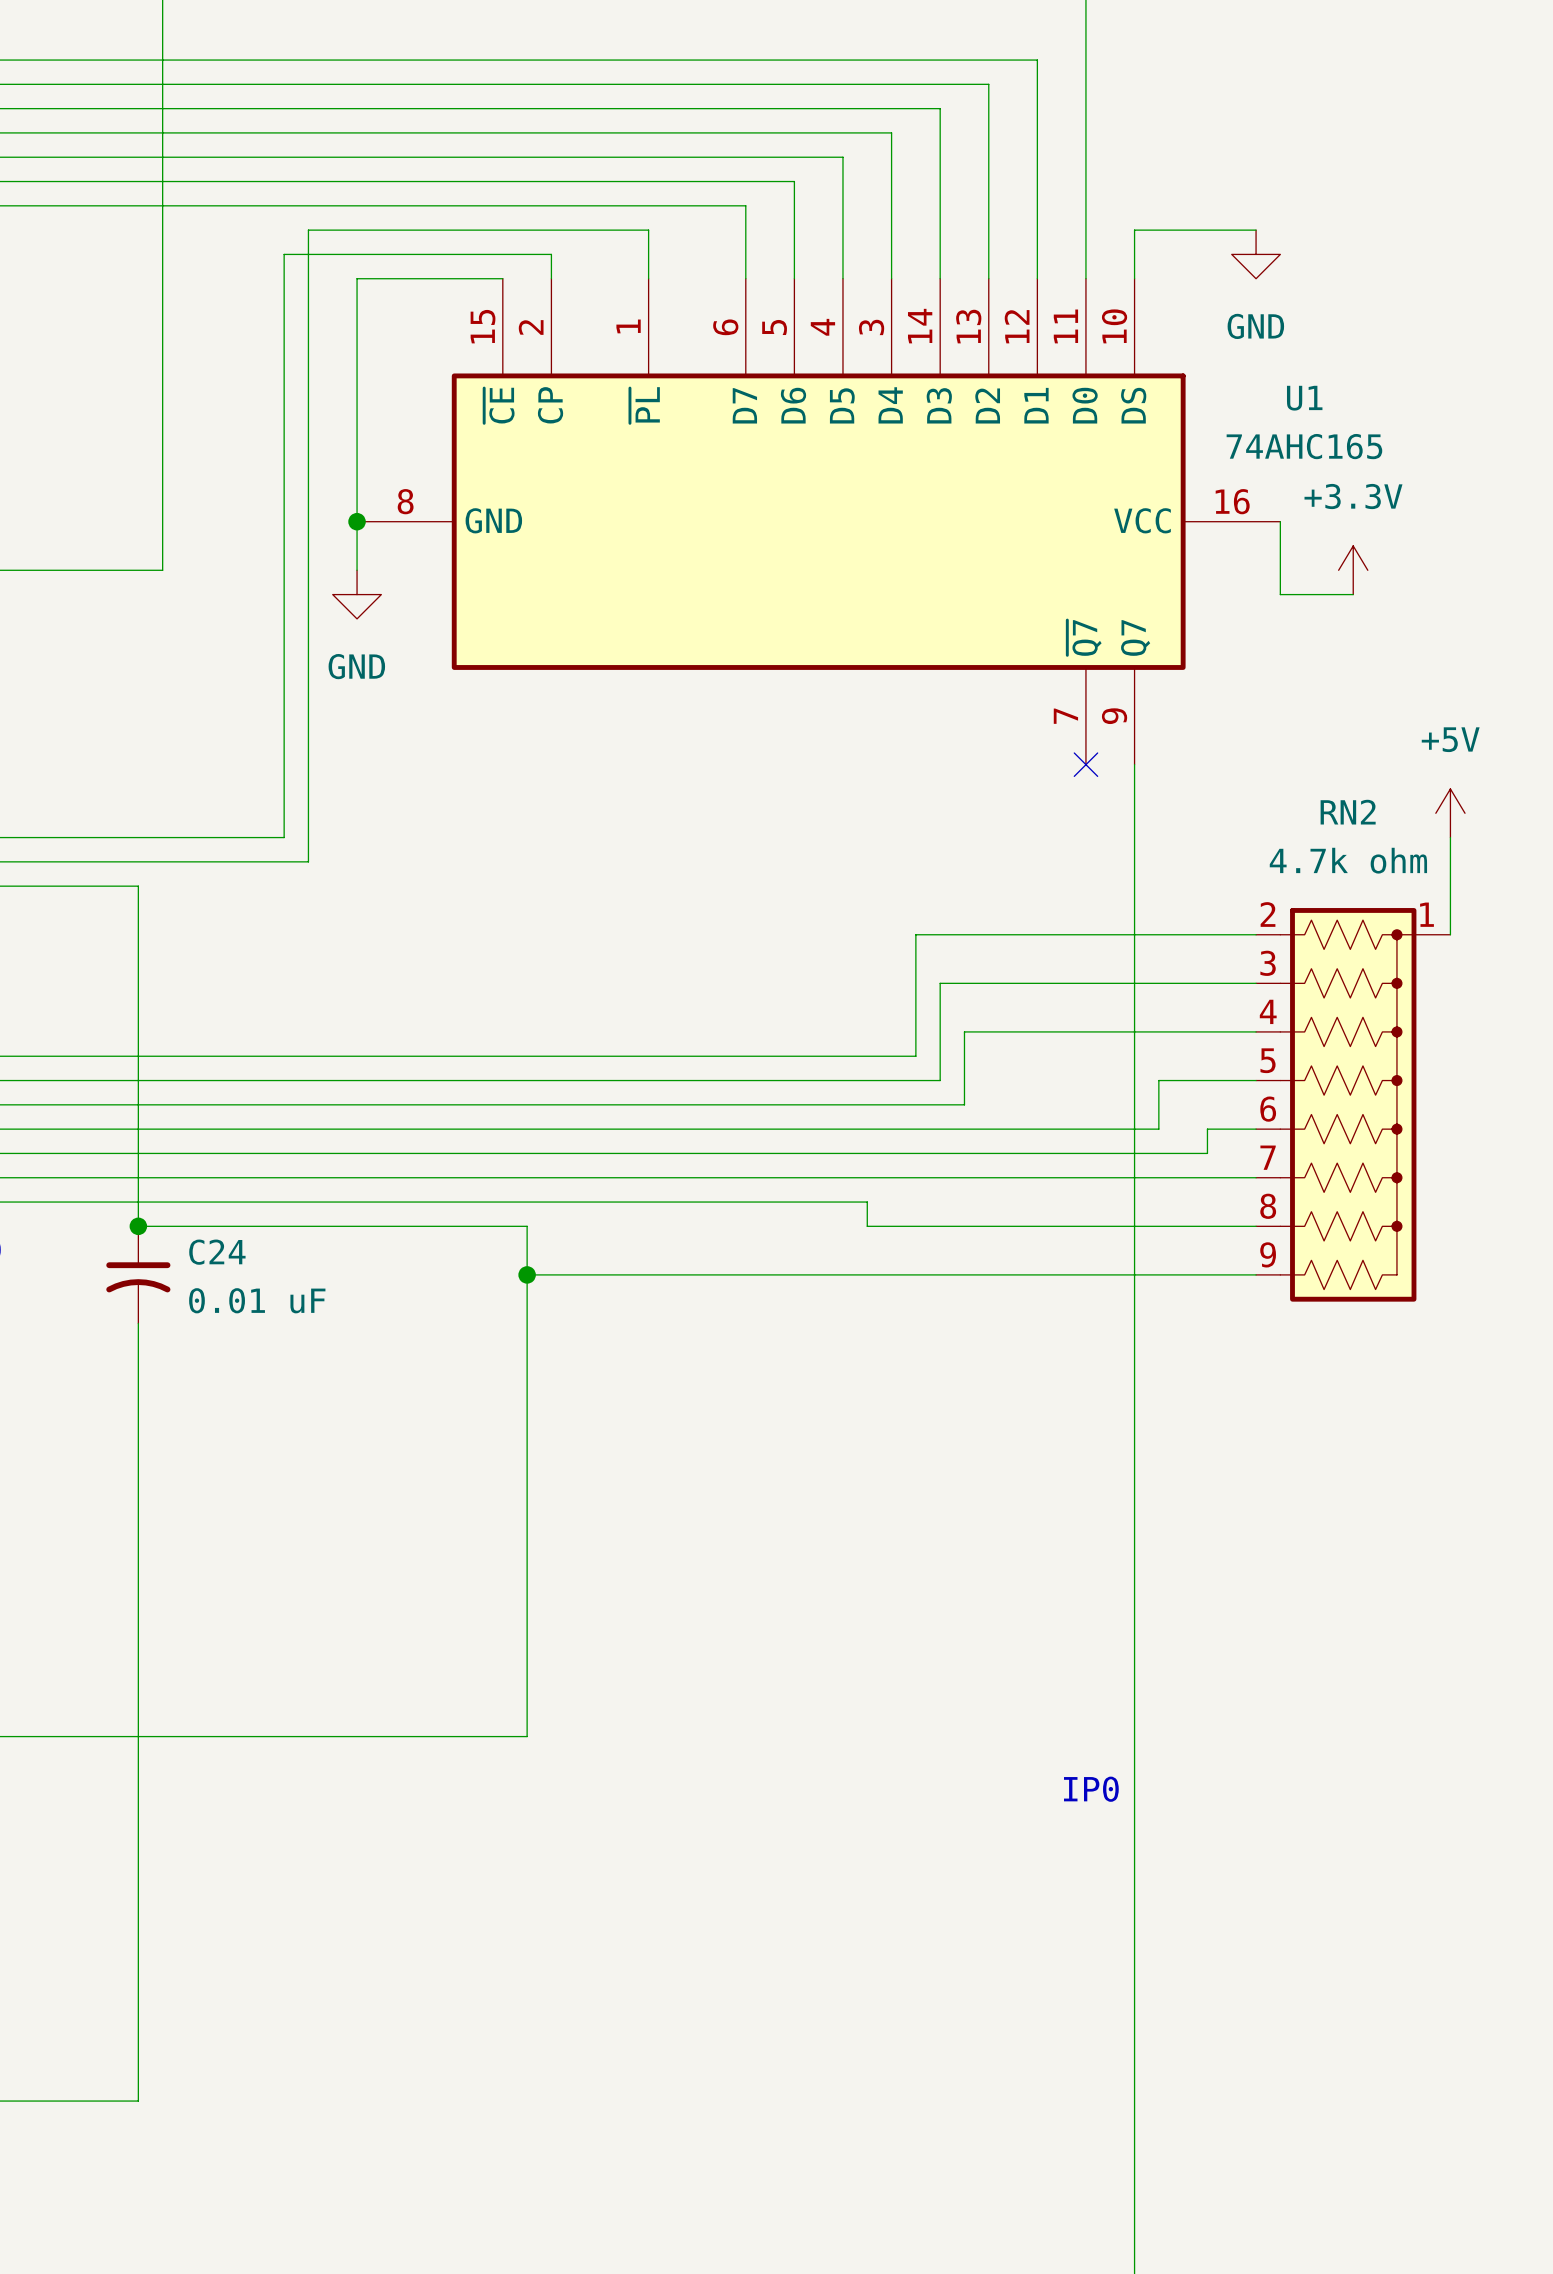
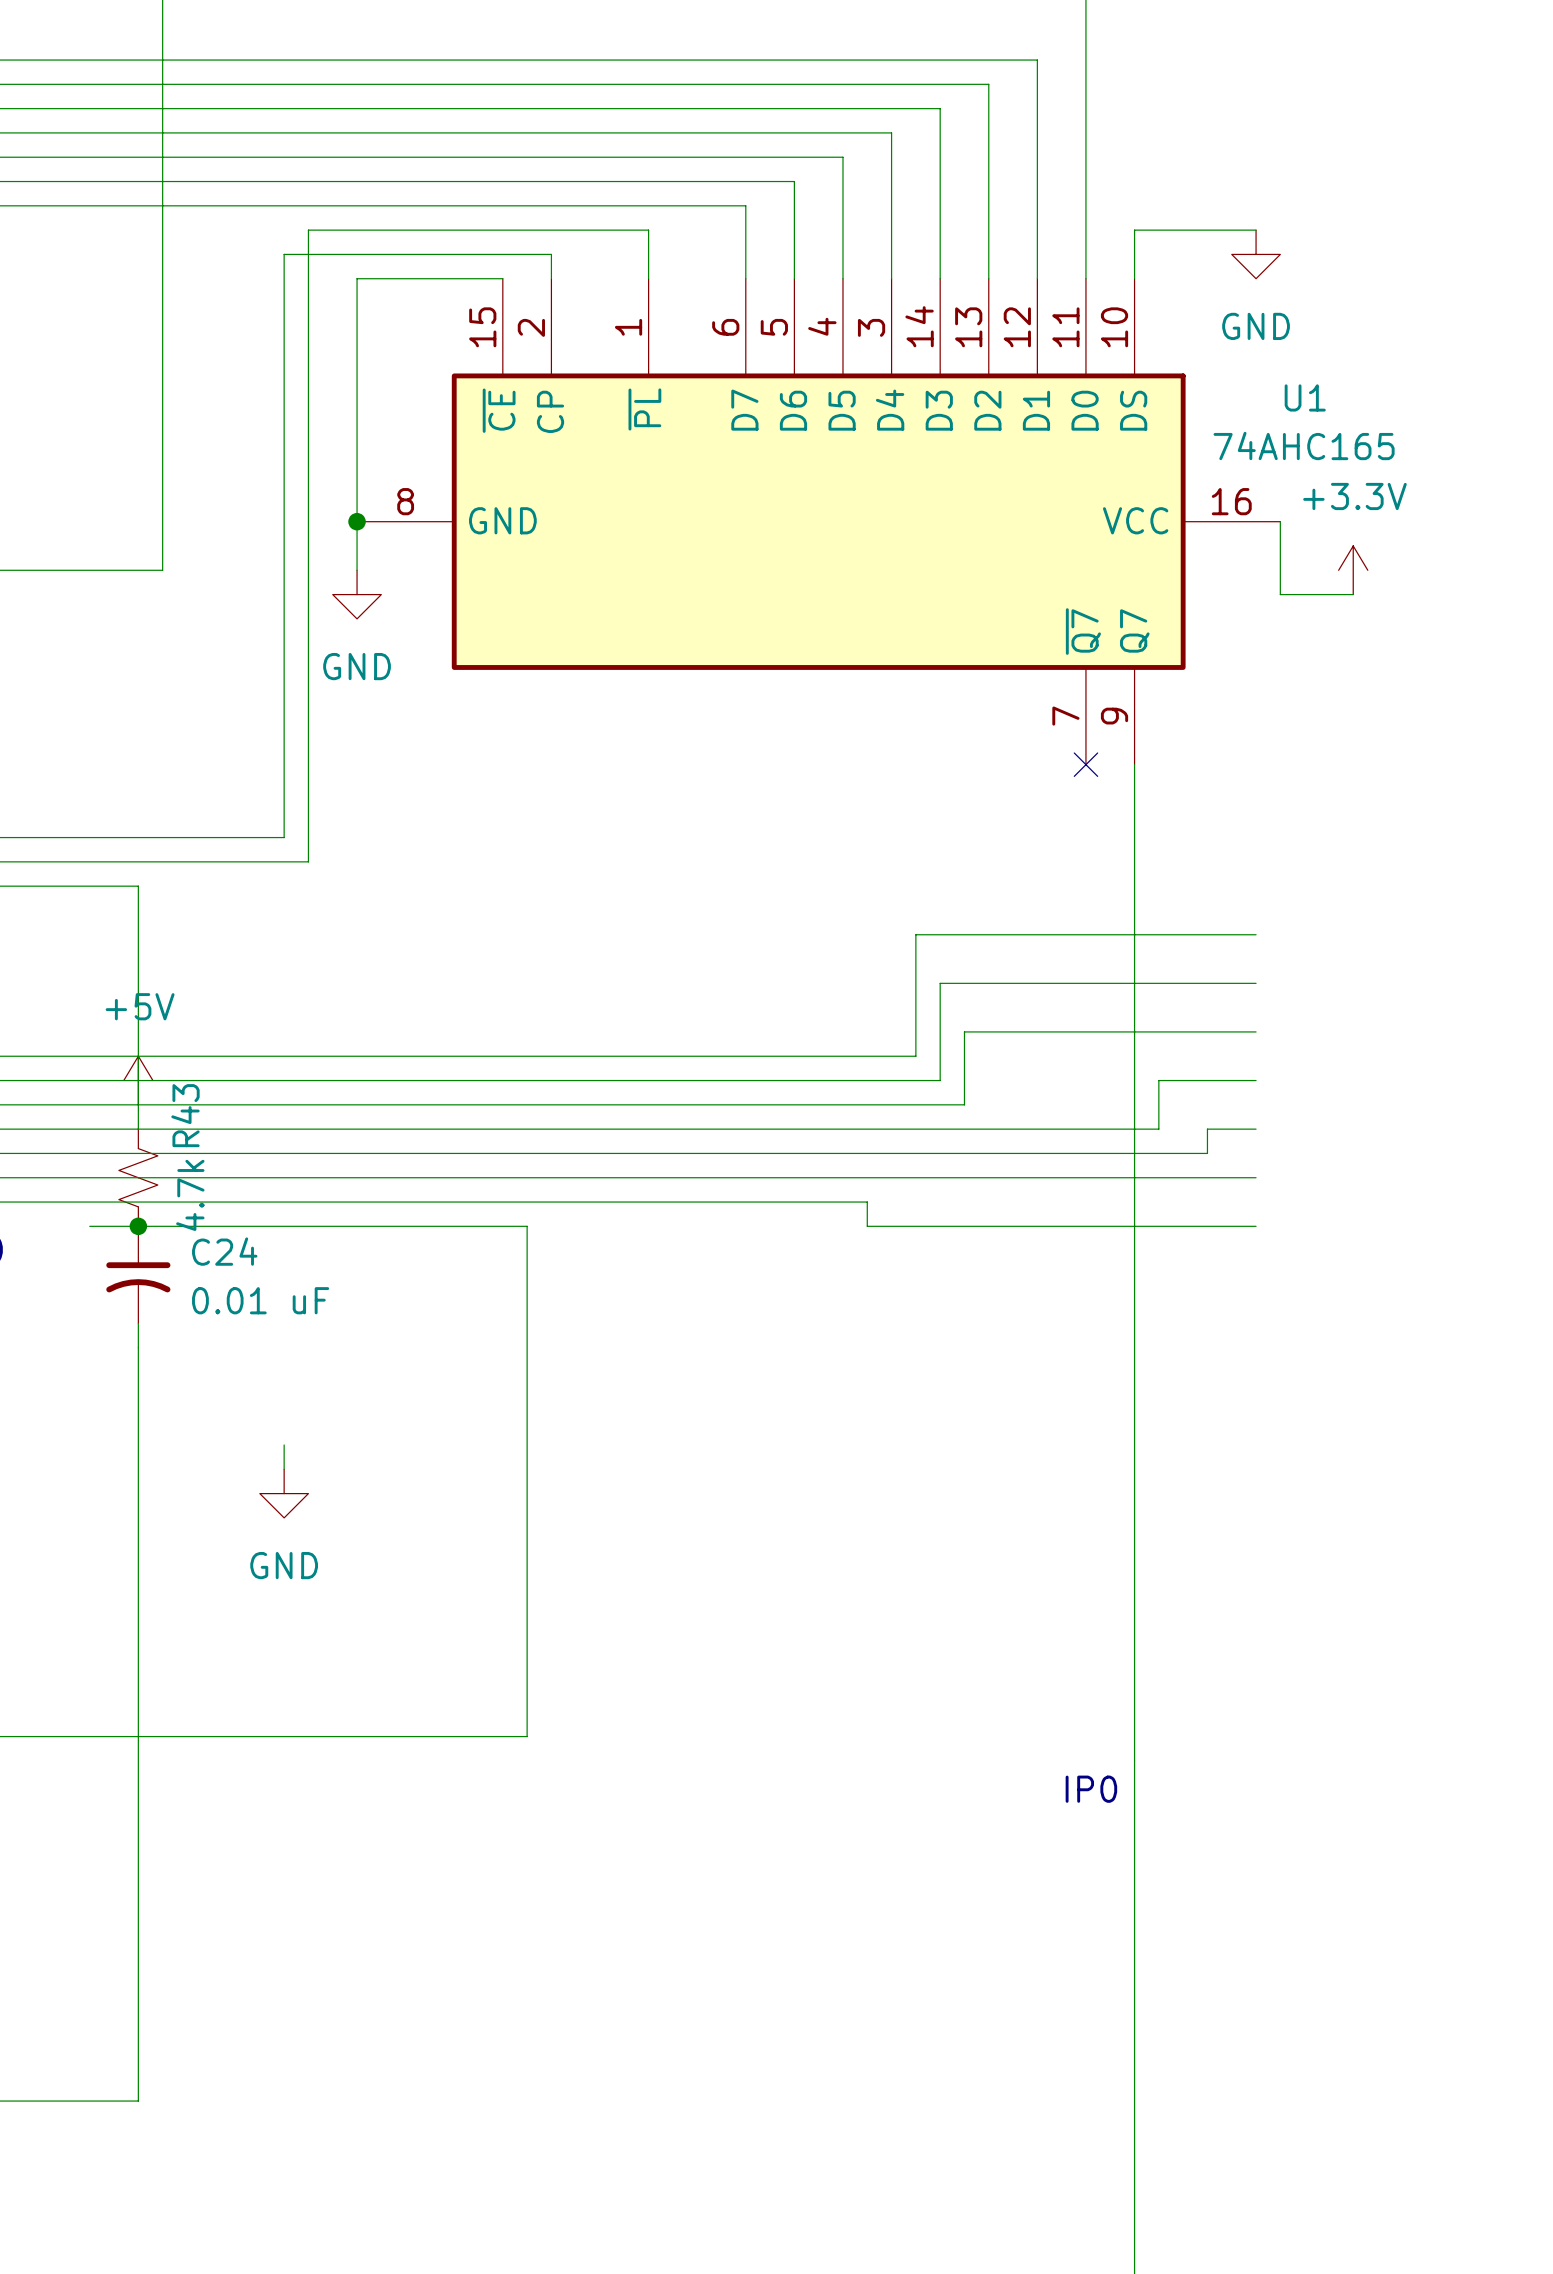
power symbol: +5V (1450, 813) -> none
wire: (1450, 837) (1450, 934) -> none
power symbol: none -> +5V (138, 1080)
RN2: 4.7k ohm (1353, 1104) -> none
wire: (138, 1129) (138, 1226) -> (89, 1226) (138, 1226)
R43: none -> 4.7k (138, 1177)
wire: (527, 1274) (1256, 1274) -> none
junction: (527, 1274) -> none
wire: none -> (284, 1445) (284, 1469)
power symbol: none -> GND (284, 1493)

